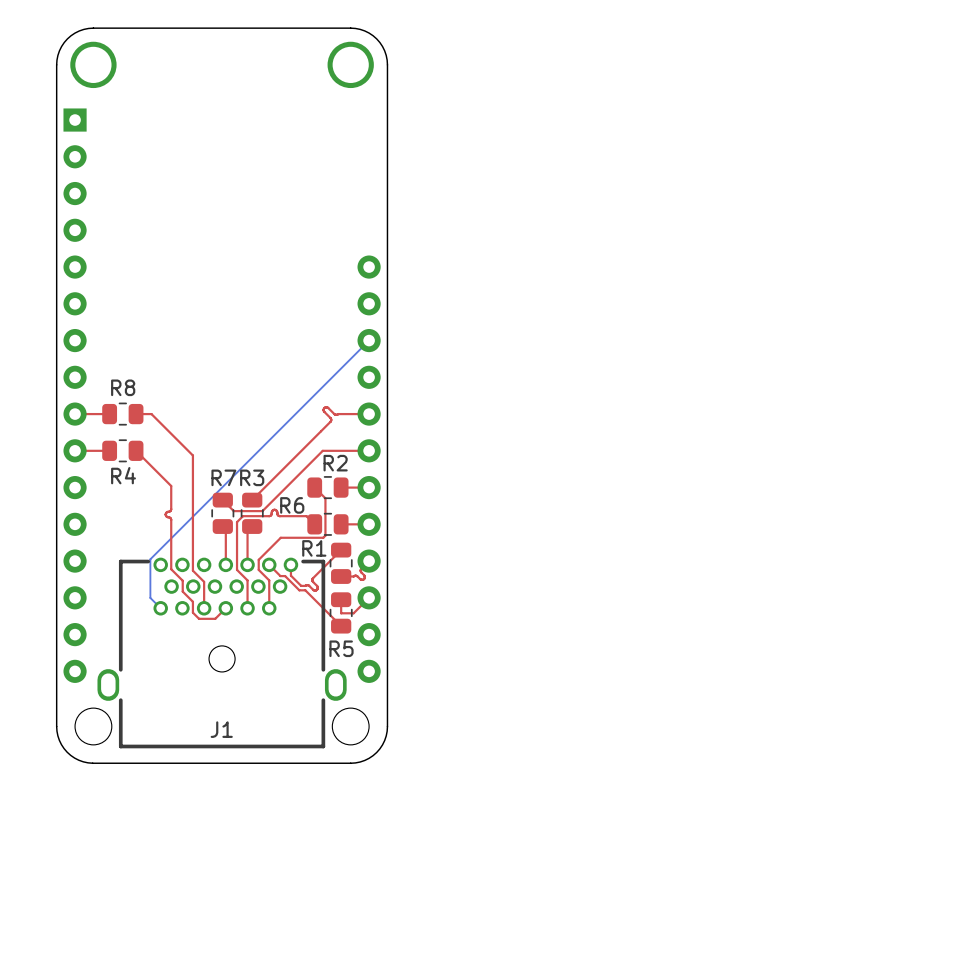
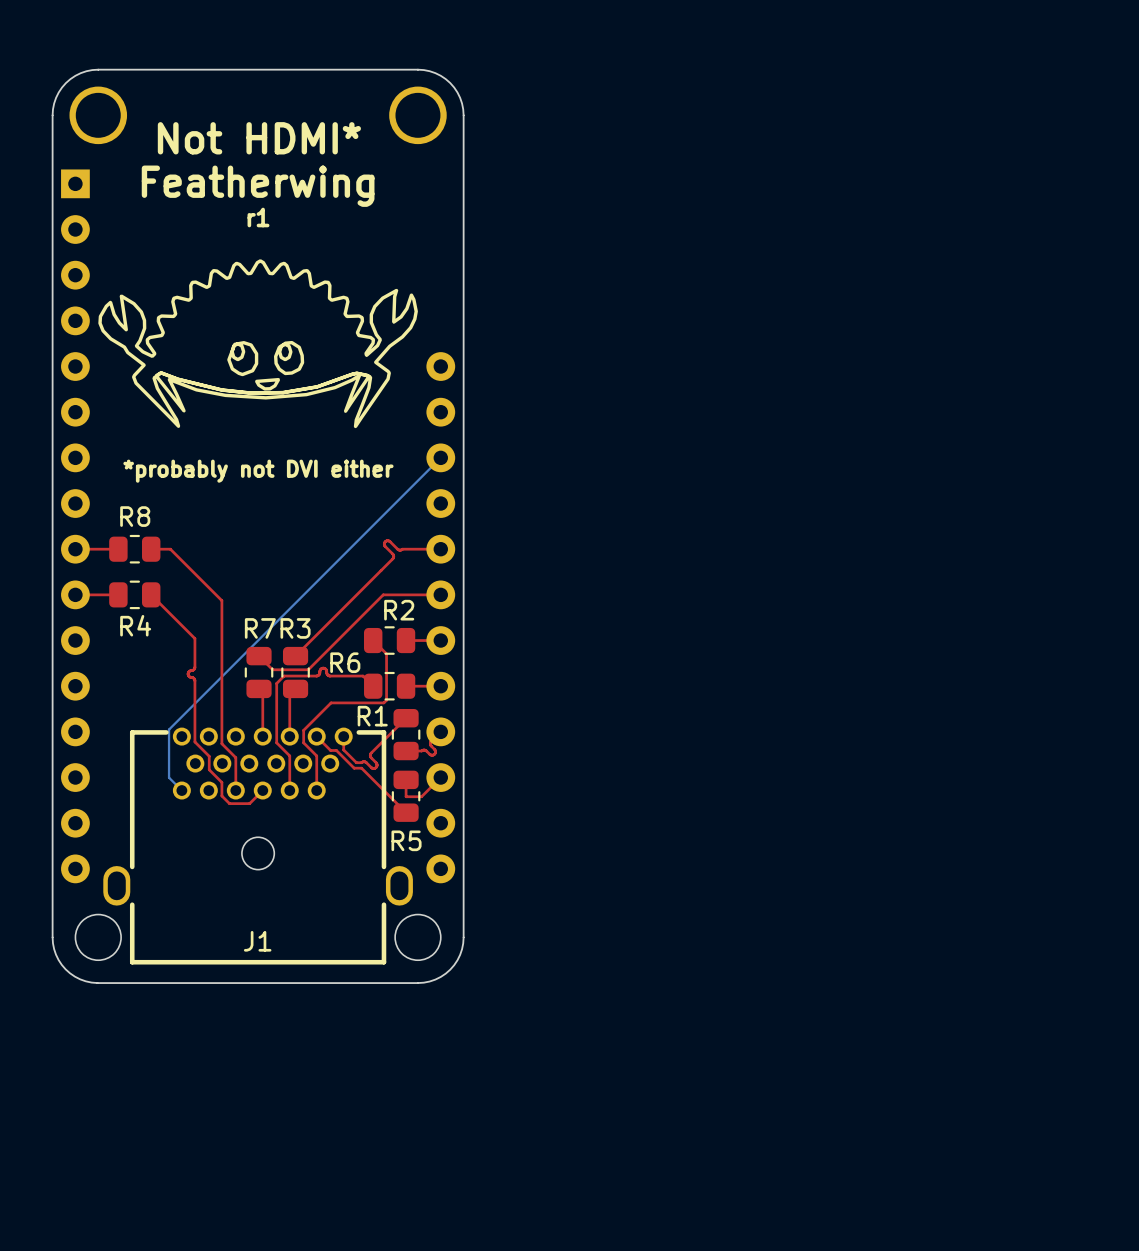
text: none -> Not HDMI* (259, 138)
text: none -> Featherwing (258, 186)
text: none -> r1 (258, 217)
drawing: none -> [98, 259, 418, 429]
text: none -> *probably not DVI either (258, 471)

